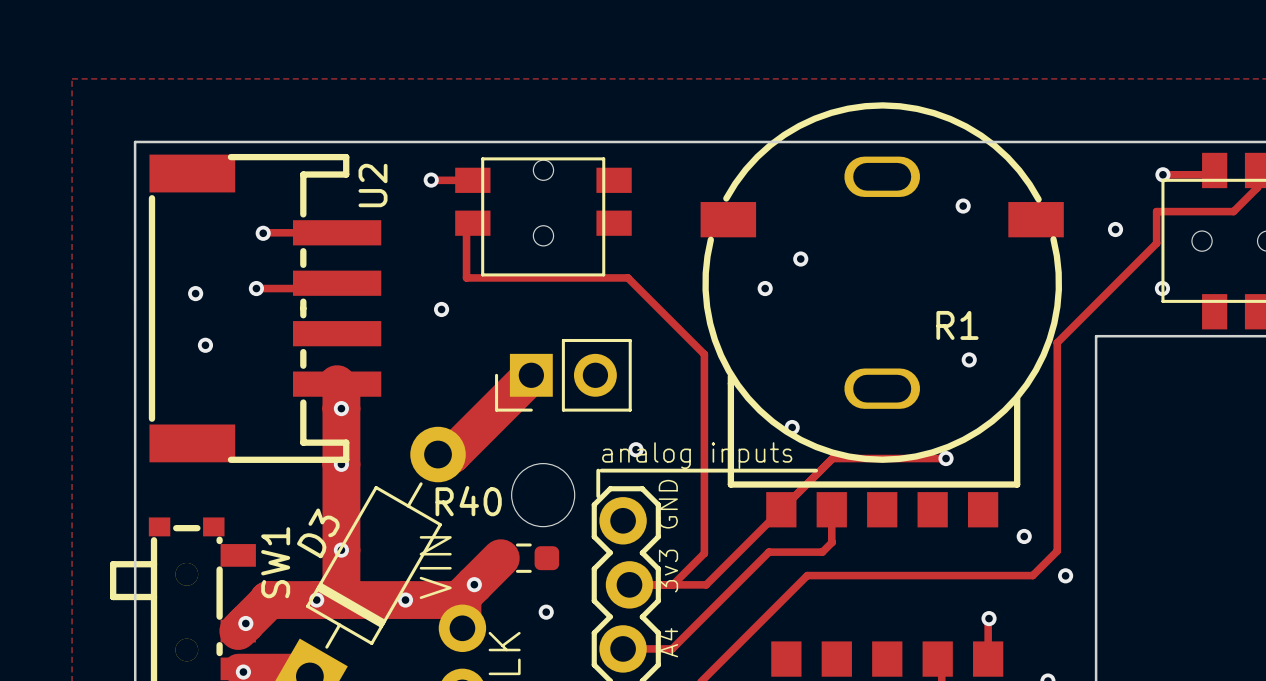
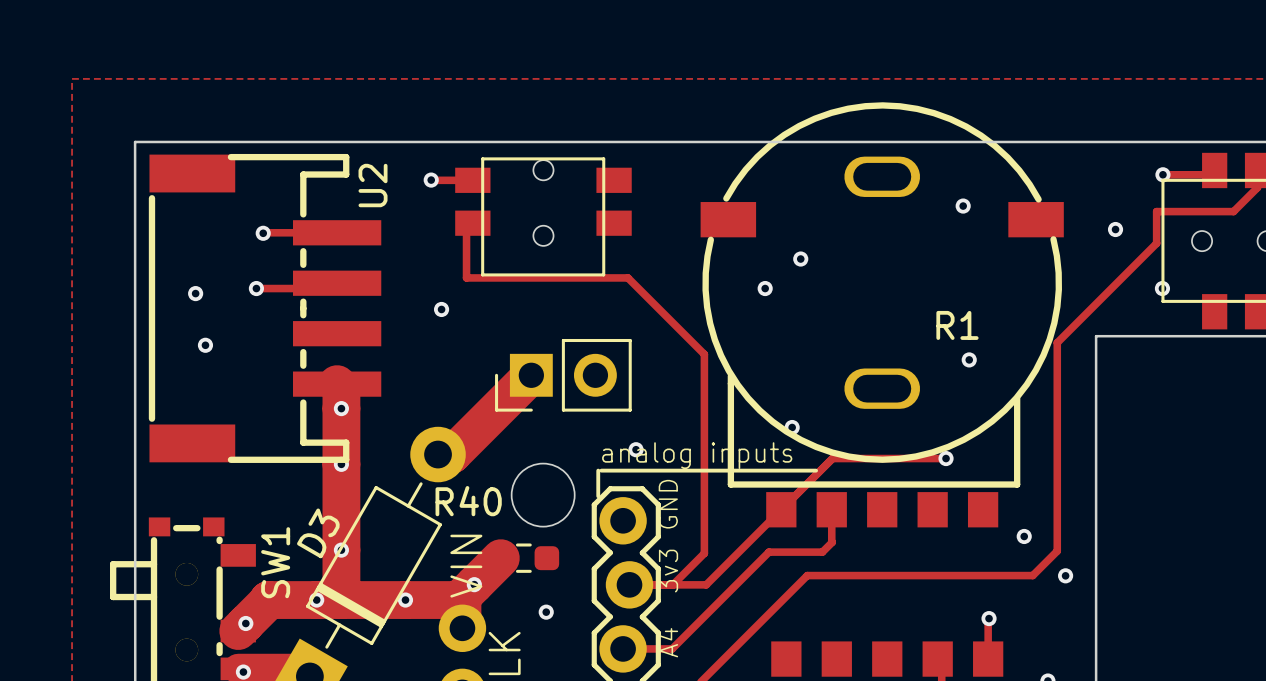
text position: VIN (435, 567) -> VIN (466, 566)

